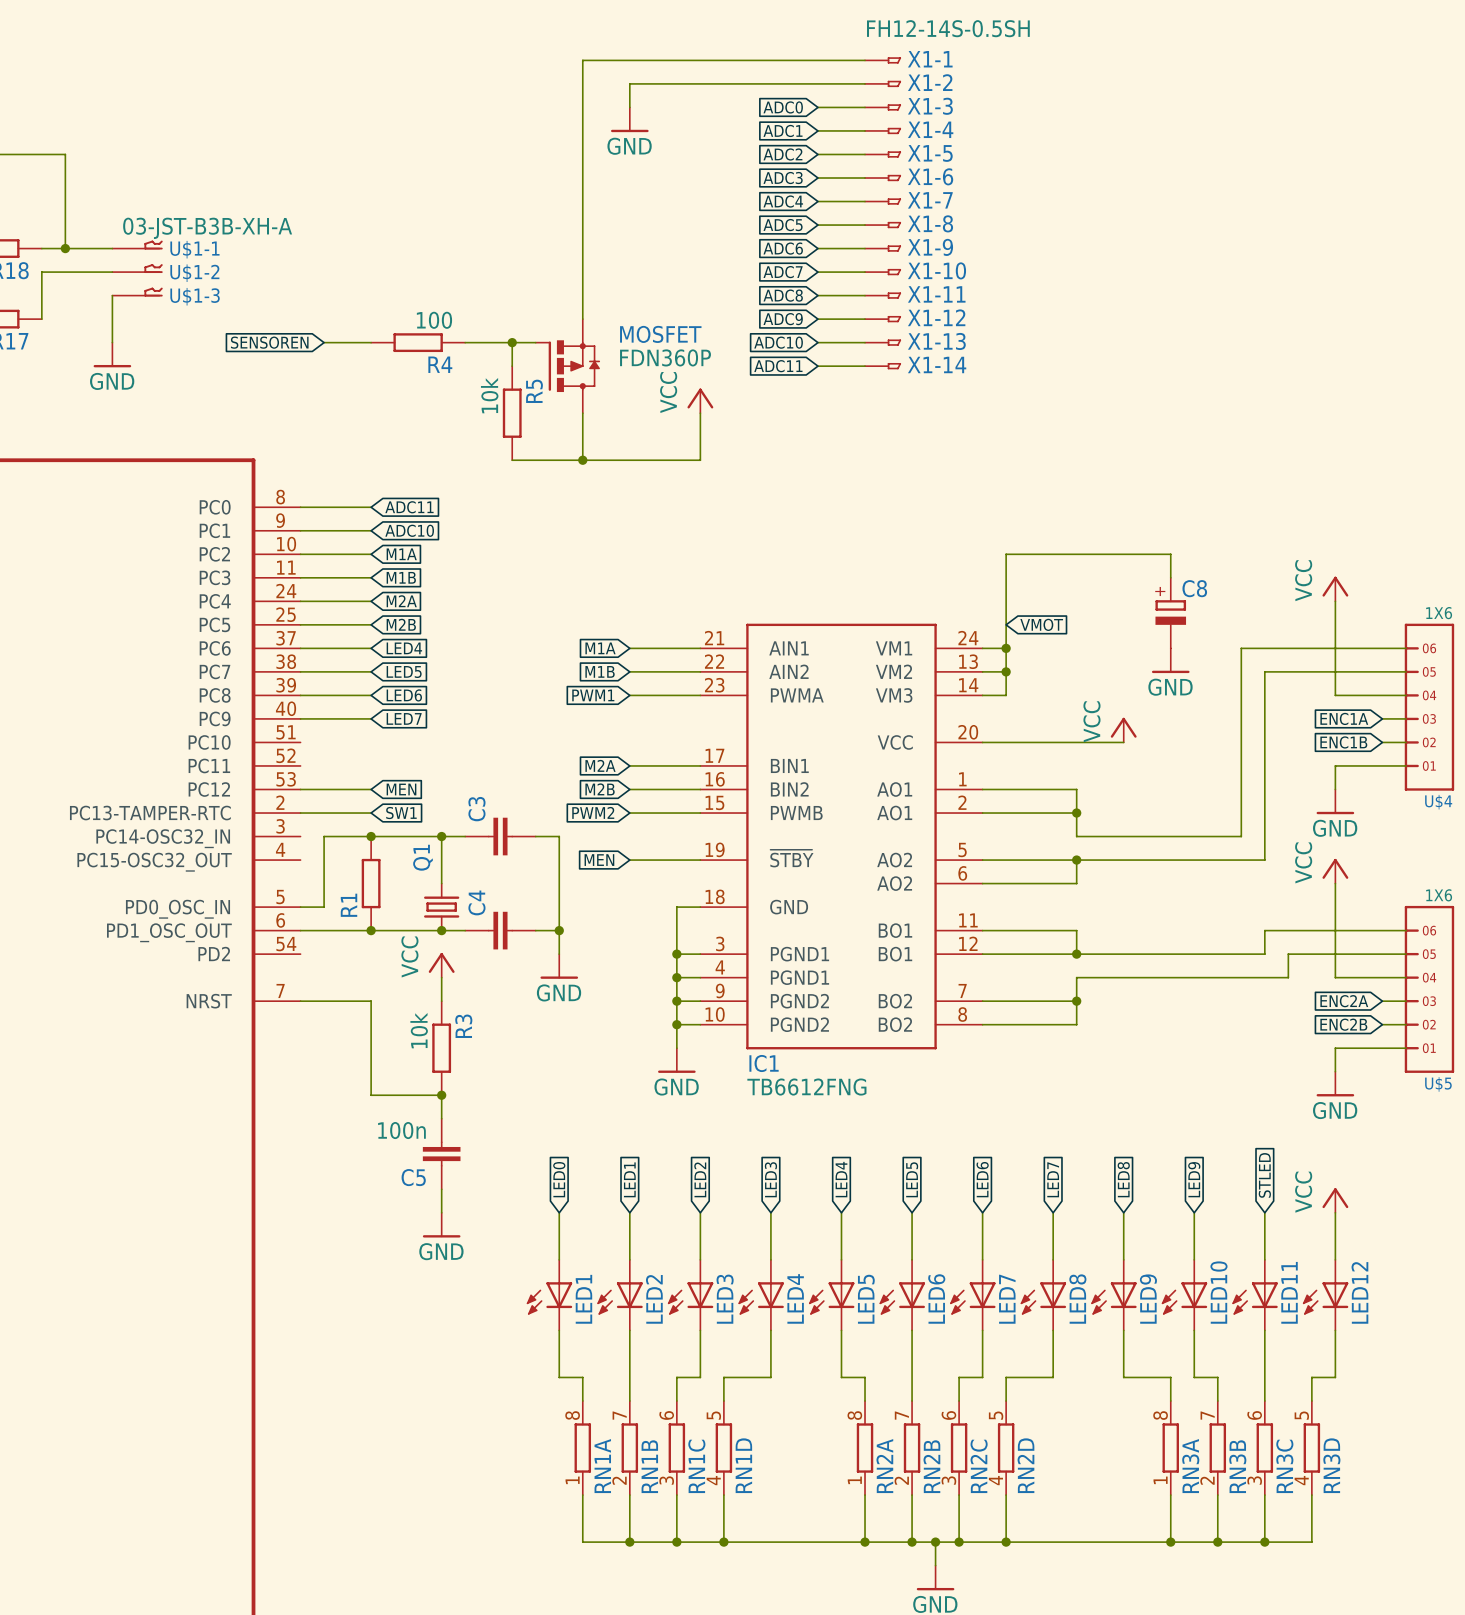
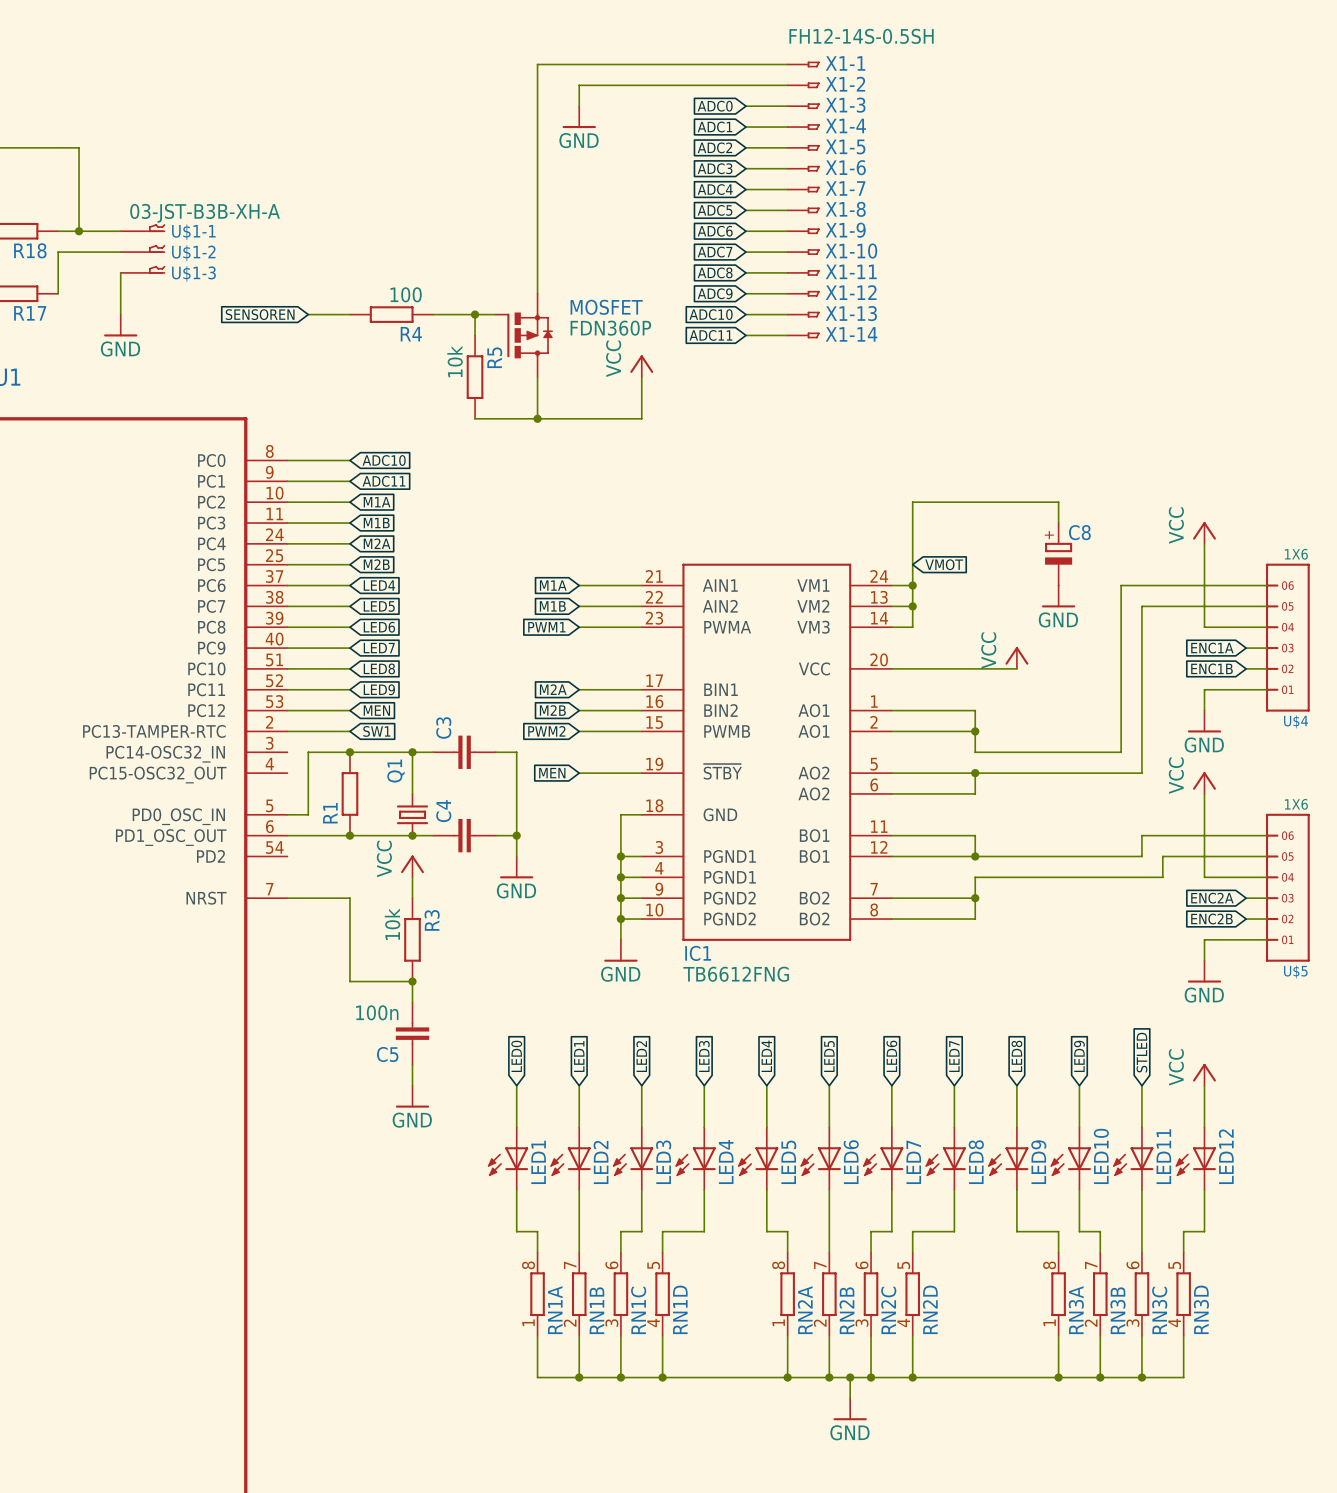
global label: ADC11 (409, 507) -> ADC10 (384, 460)
global label: ADC10 (409, 530) -> ADC11 (383, 481)
wire: none -> (287, 668) (349, 668)
global label: none -> LED8 (379, 668)
wire: none -> (287, 689) (349, 689)
global label: none -> LED9 (379, 689)

